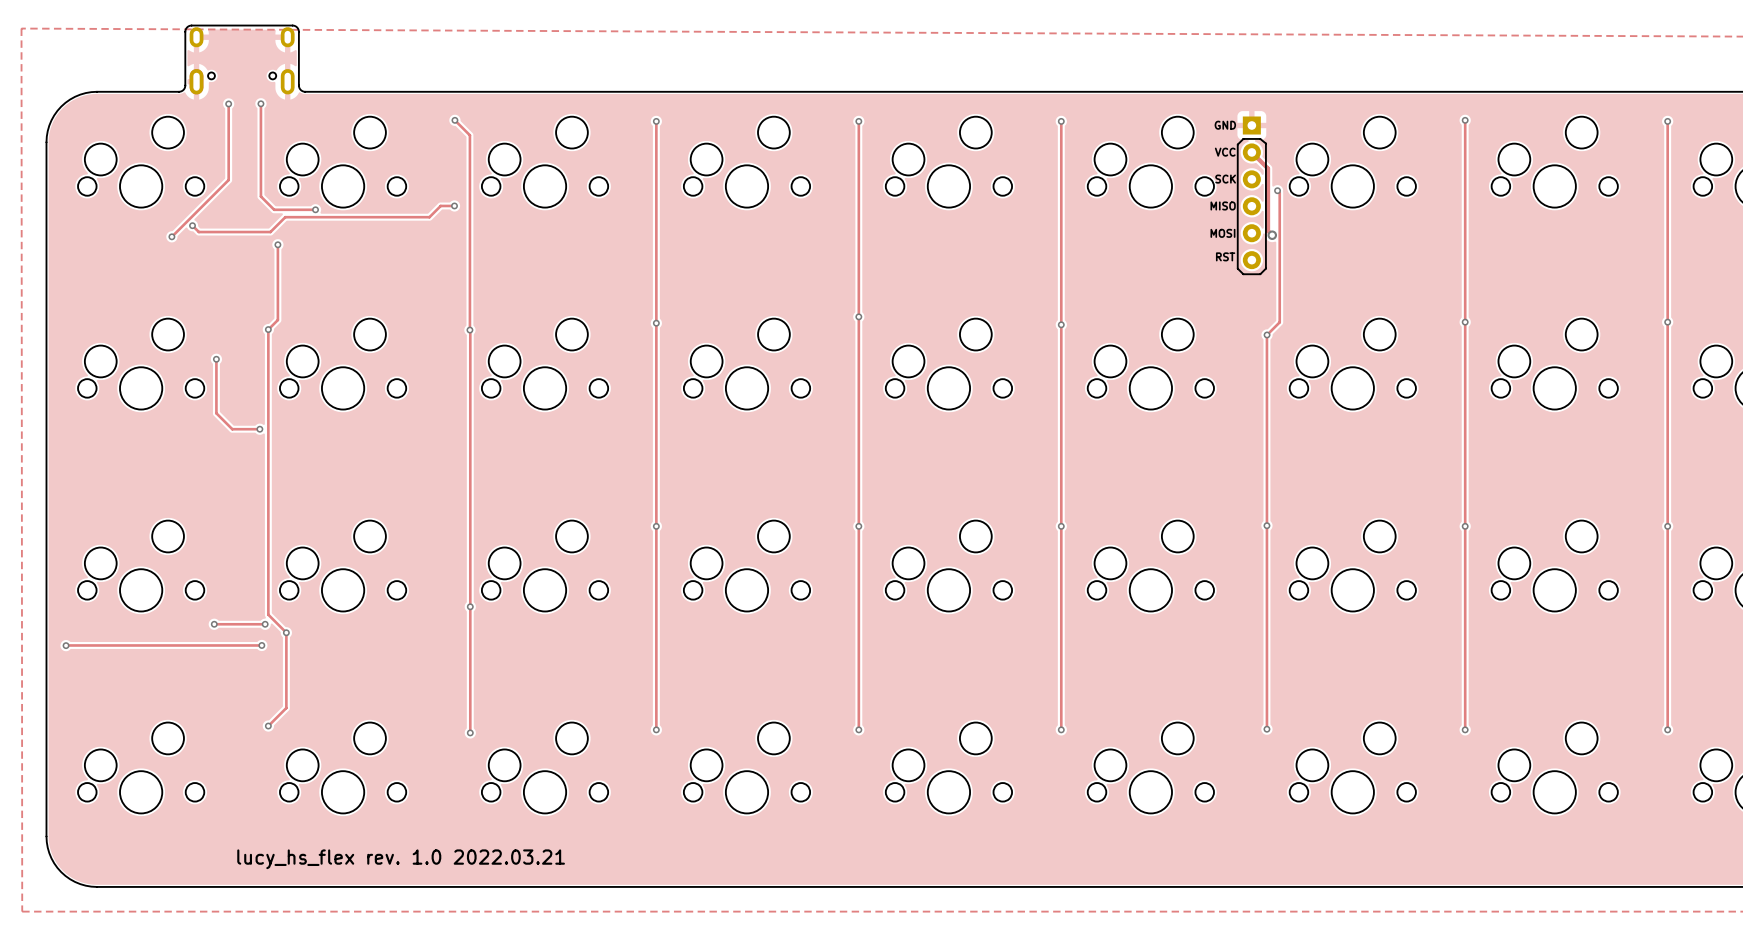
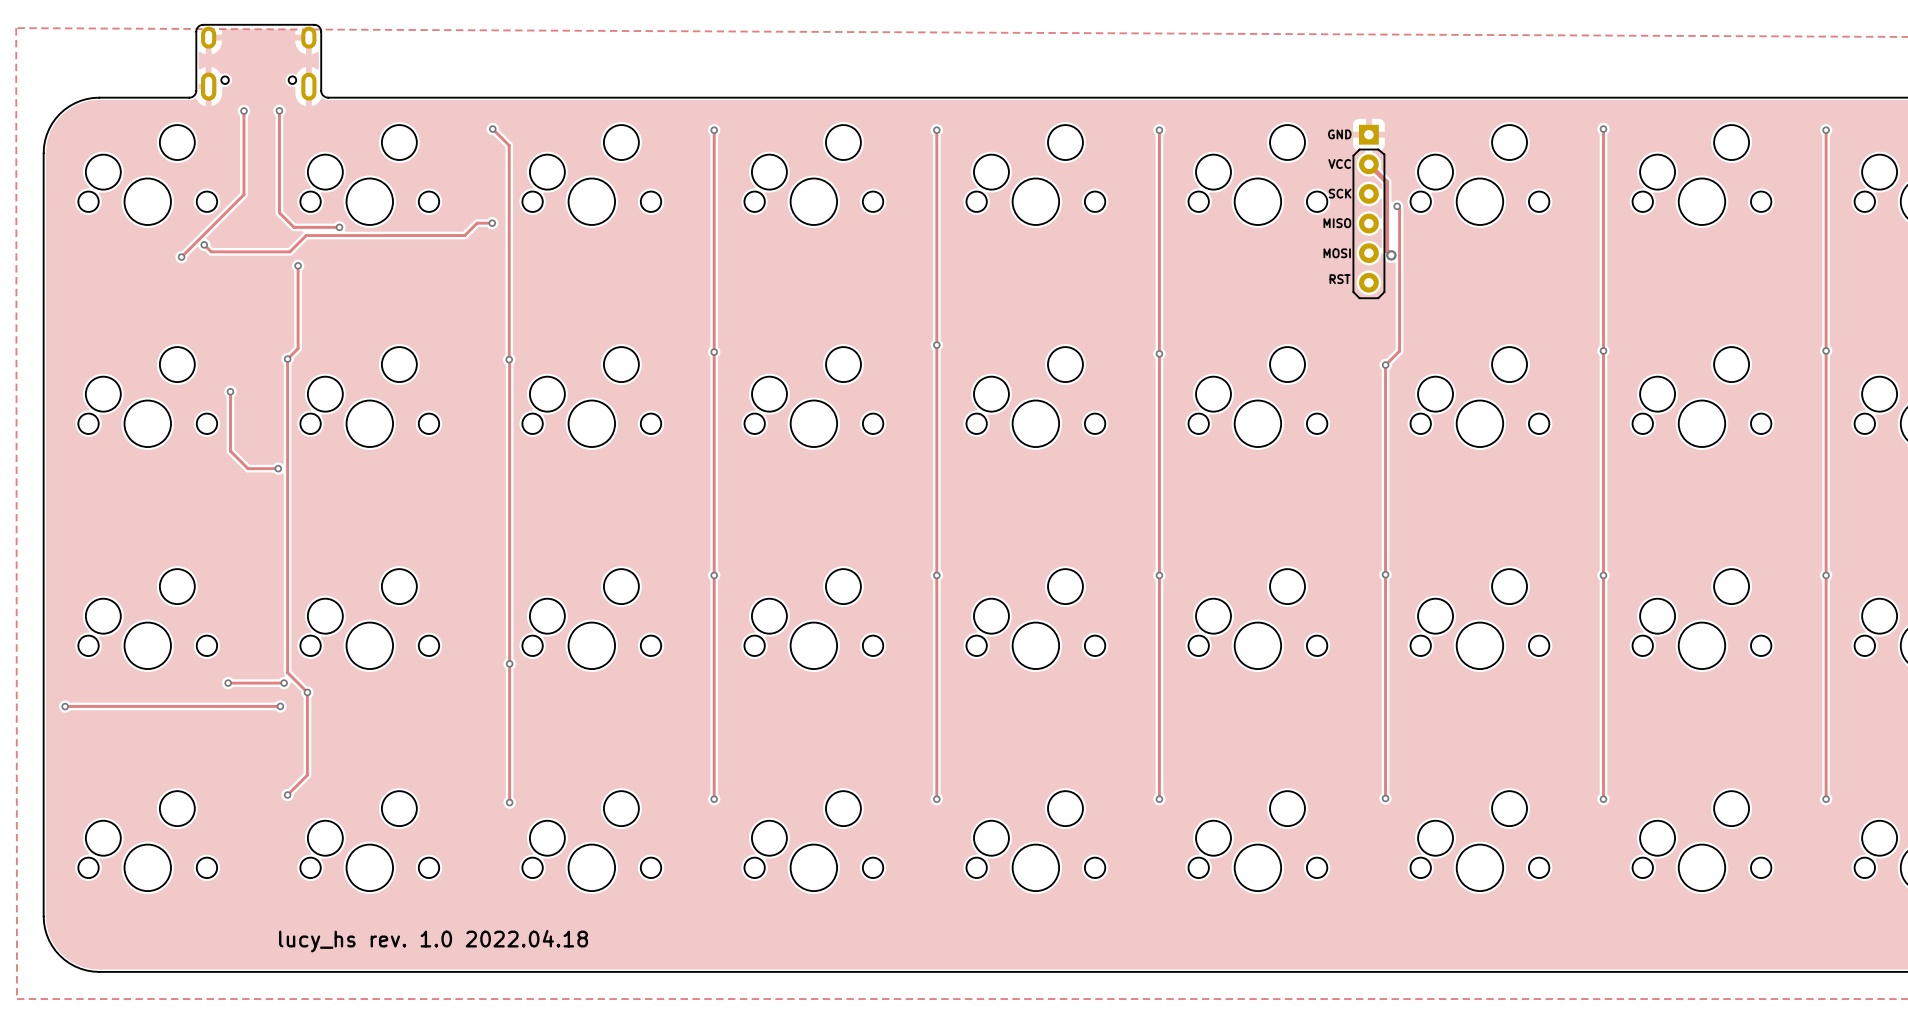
text: lucy_hs_flex rev. 1.0 2022.03.21 (401, 859) -> lucy_hs rev. 1.0 2022.04.18 (433, 941)

